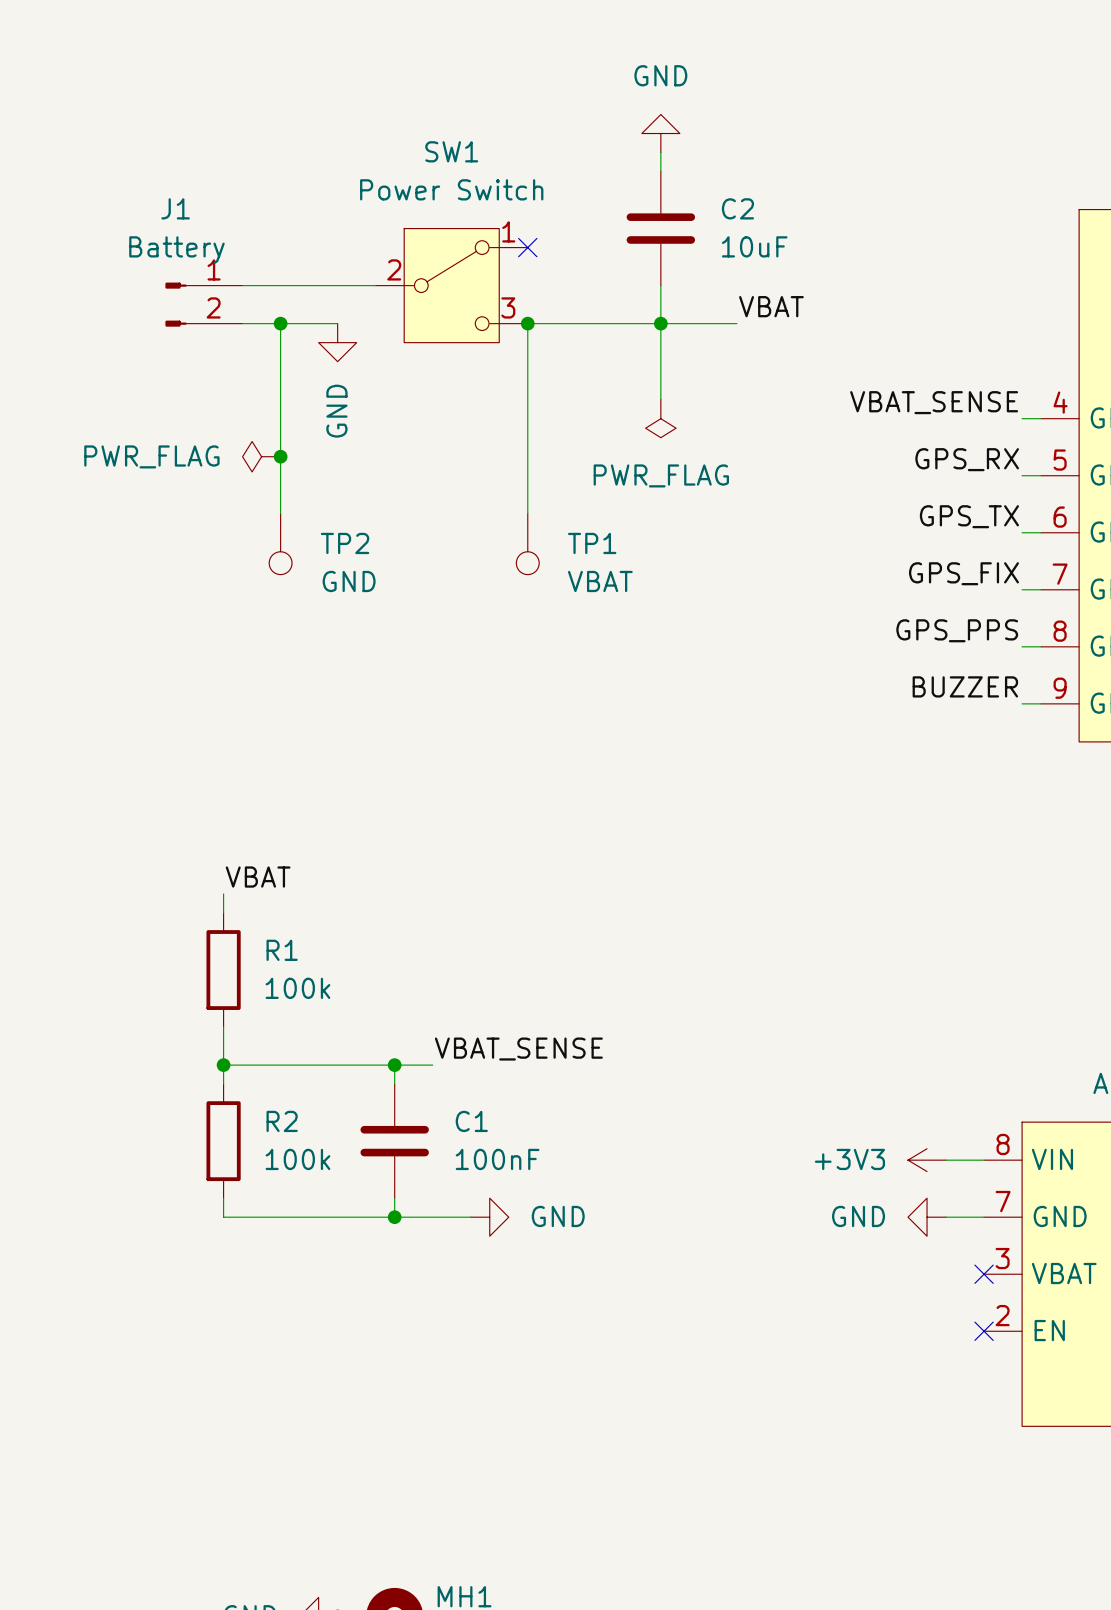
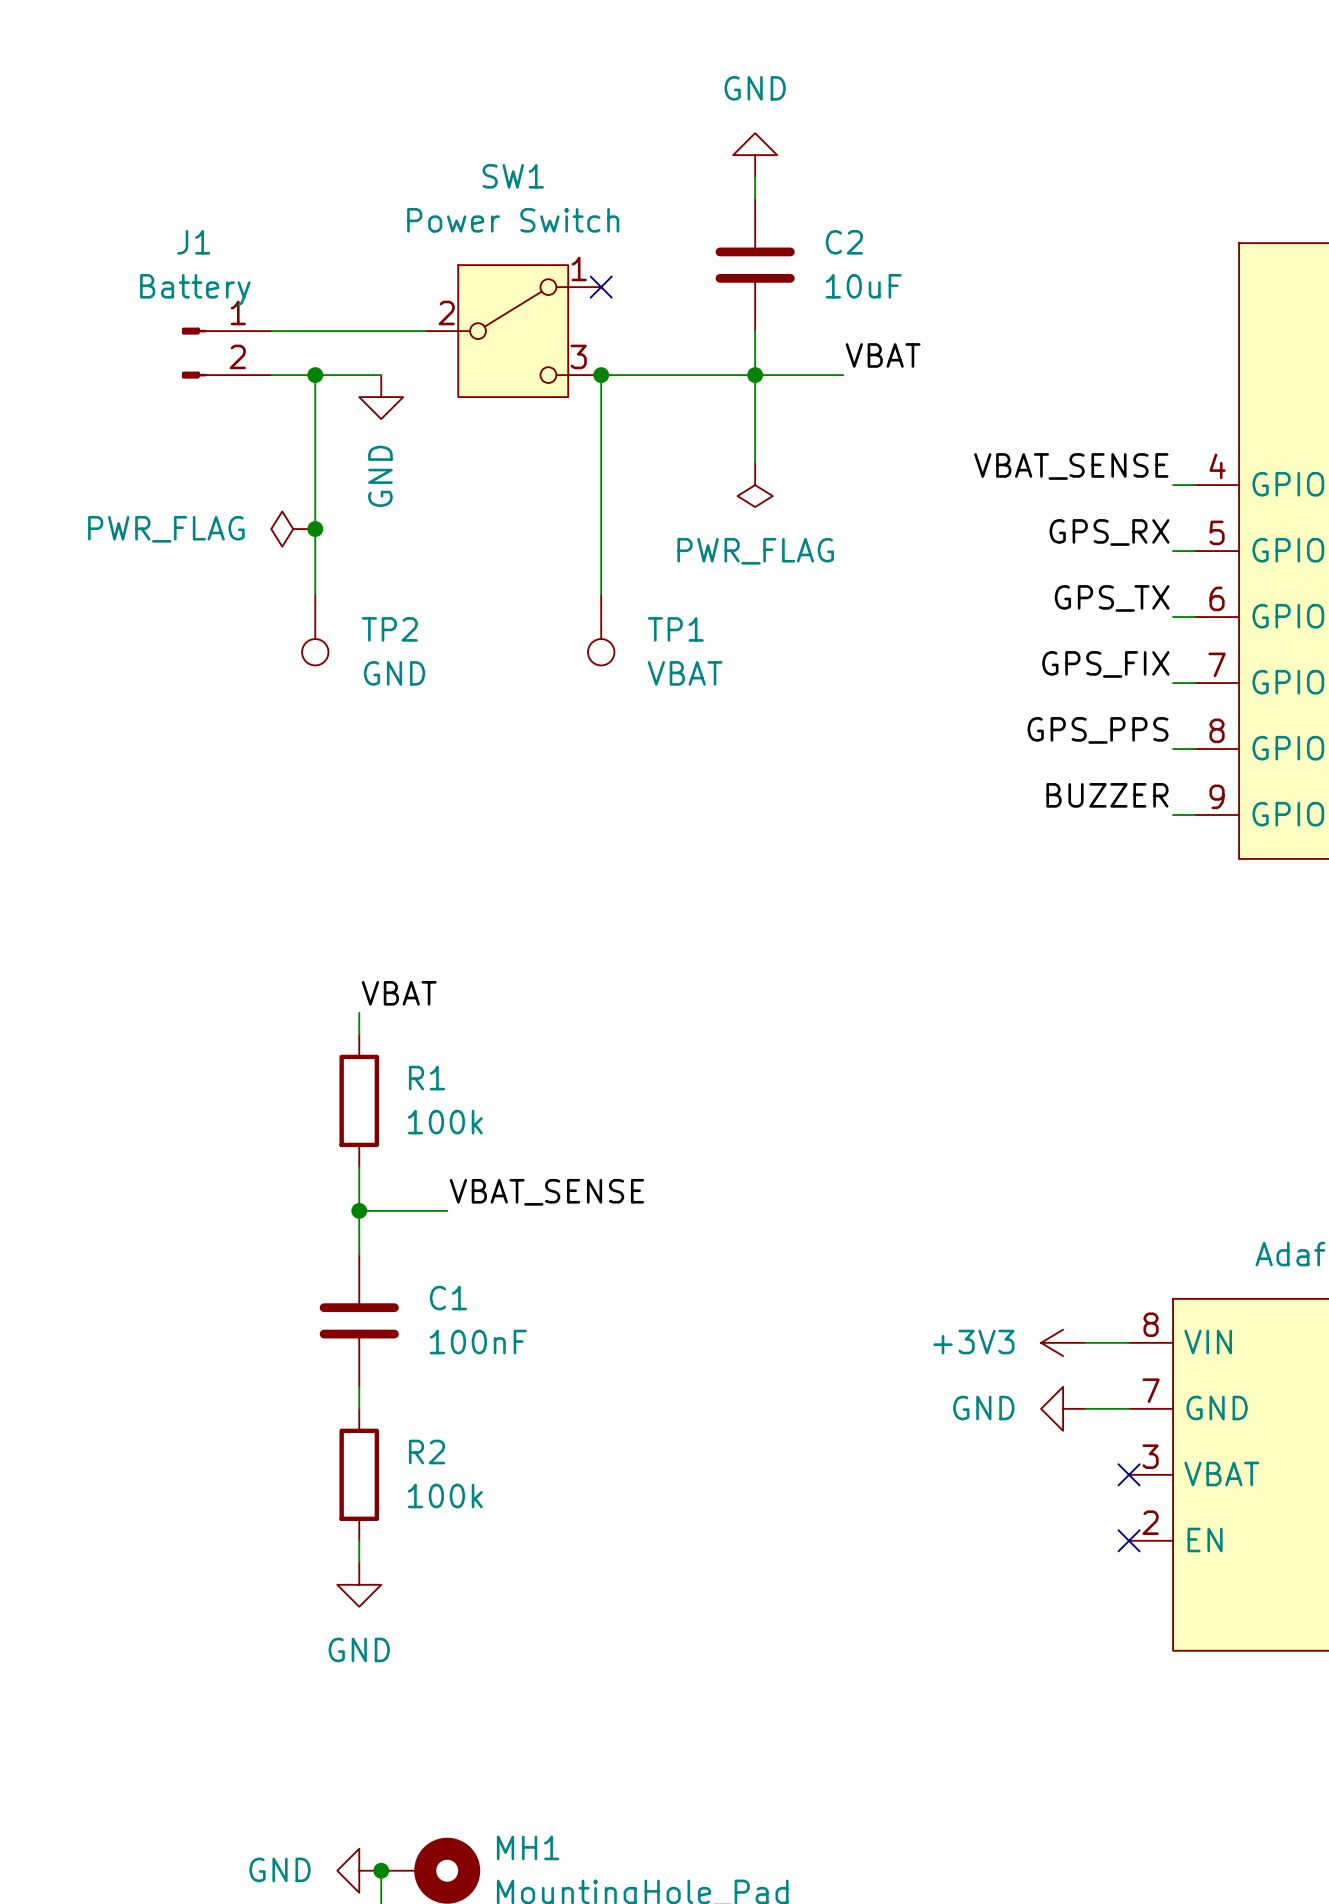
label position: VBAT (258, 877) -> VBAT (399, 993)
wire: (223, 893) (223, 913) -> (359, 1012) (359, 1034)
R1 position: (223, 970) -> (359, 1100)
wire: none -> (359, 1166) (359, 1254)
wire: (223, 1027) (223, 1084) -> none
wire: none -> (359, 1210) (447, 1210)
junction: none -> (359, 1210)
label position: VBAT_SENSE (518, 1049) -> VBAT_SENSE (546, 1192)
wire: (223, 1065) (432, 1065) -> none
junction: (223, 1065) -> none
wire: (394, 1065) (394, 1084) -> (359, 1386) (359, 1408)
junction: (394, 1065) -> none
R2 position: (223, 1141) -> (359, 1474)
C1 position: (394, 1141) -> (359, 1320)
wire: (223, 1198) (223, 1217) (470, 1217) -> none
wire: (394, 1198) (394, 1217) -> (359, 1540) (359, 1562)
junction: (394, 1217) -> none
power symbol rotation: 0° (489, 1217) -> 90° clockwise (359, 1584)
power symbol position: GND (489, 1217) -> GND (359, 1584)

